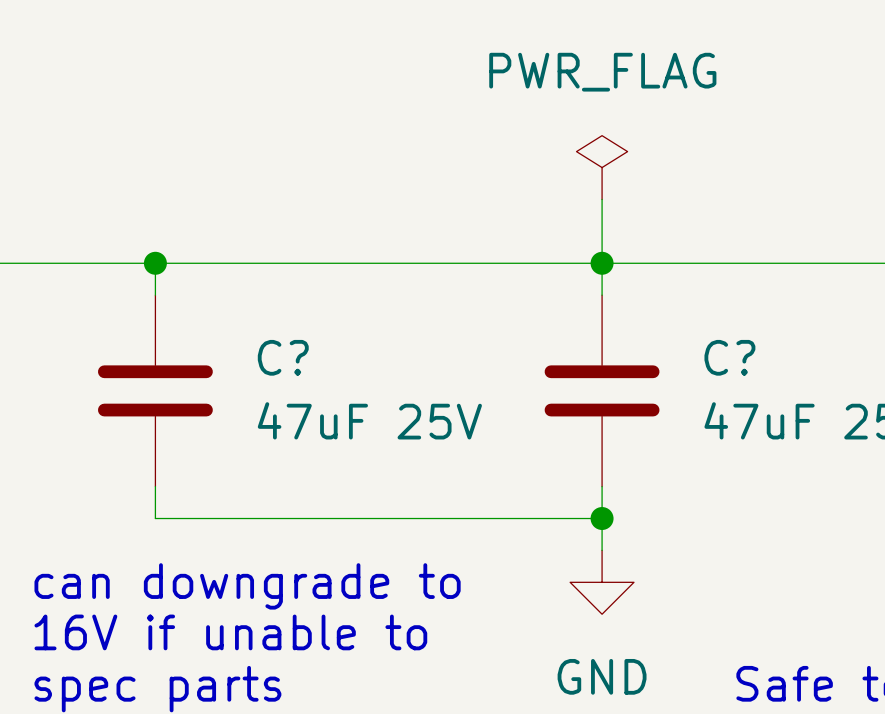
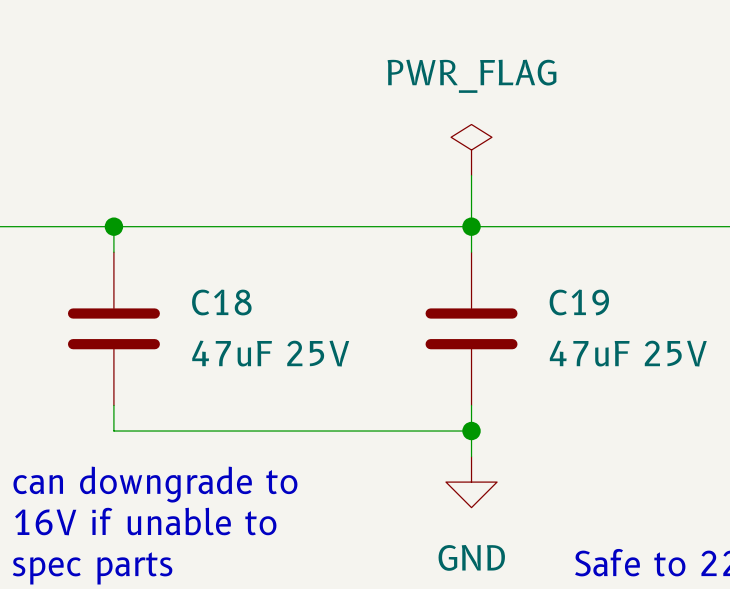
C? name: C? (283, 357) -> C18 (221, 302)
C? name: C? (729, 357) -> C19 (579, 302)

